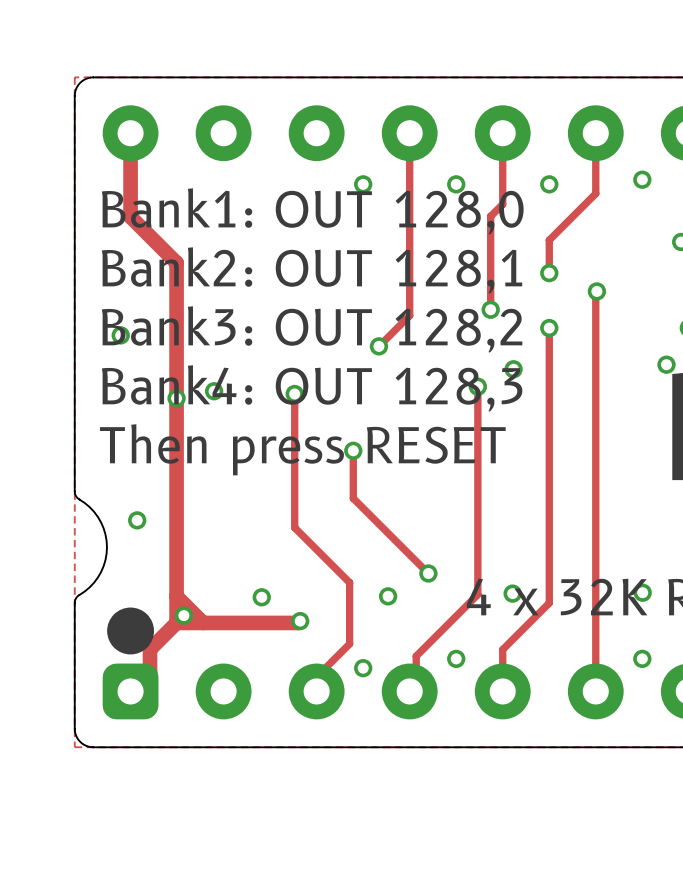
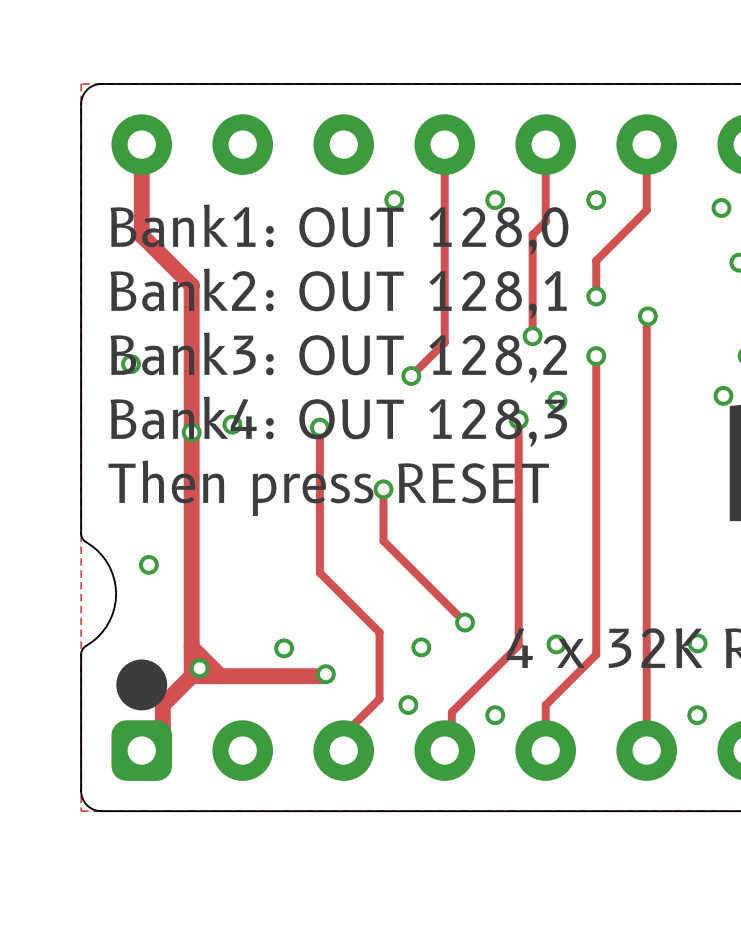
via position: (642, 179) -> (721, 208)
via position: (363, 668) -> (408, 705)

